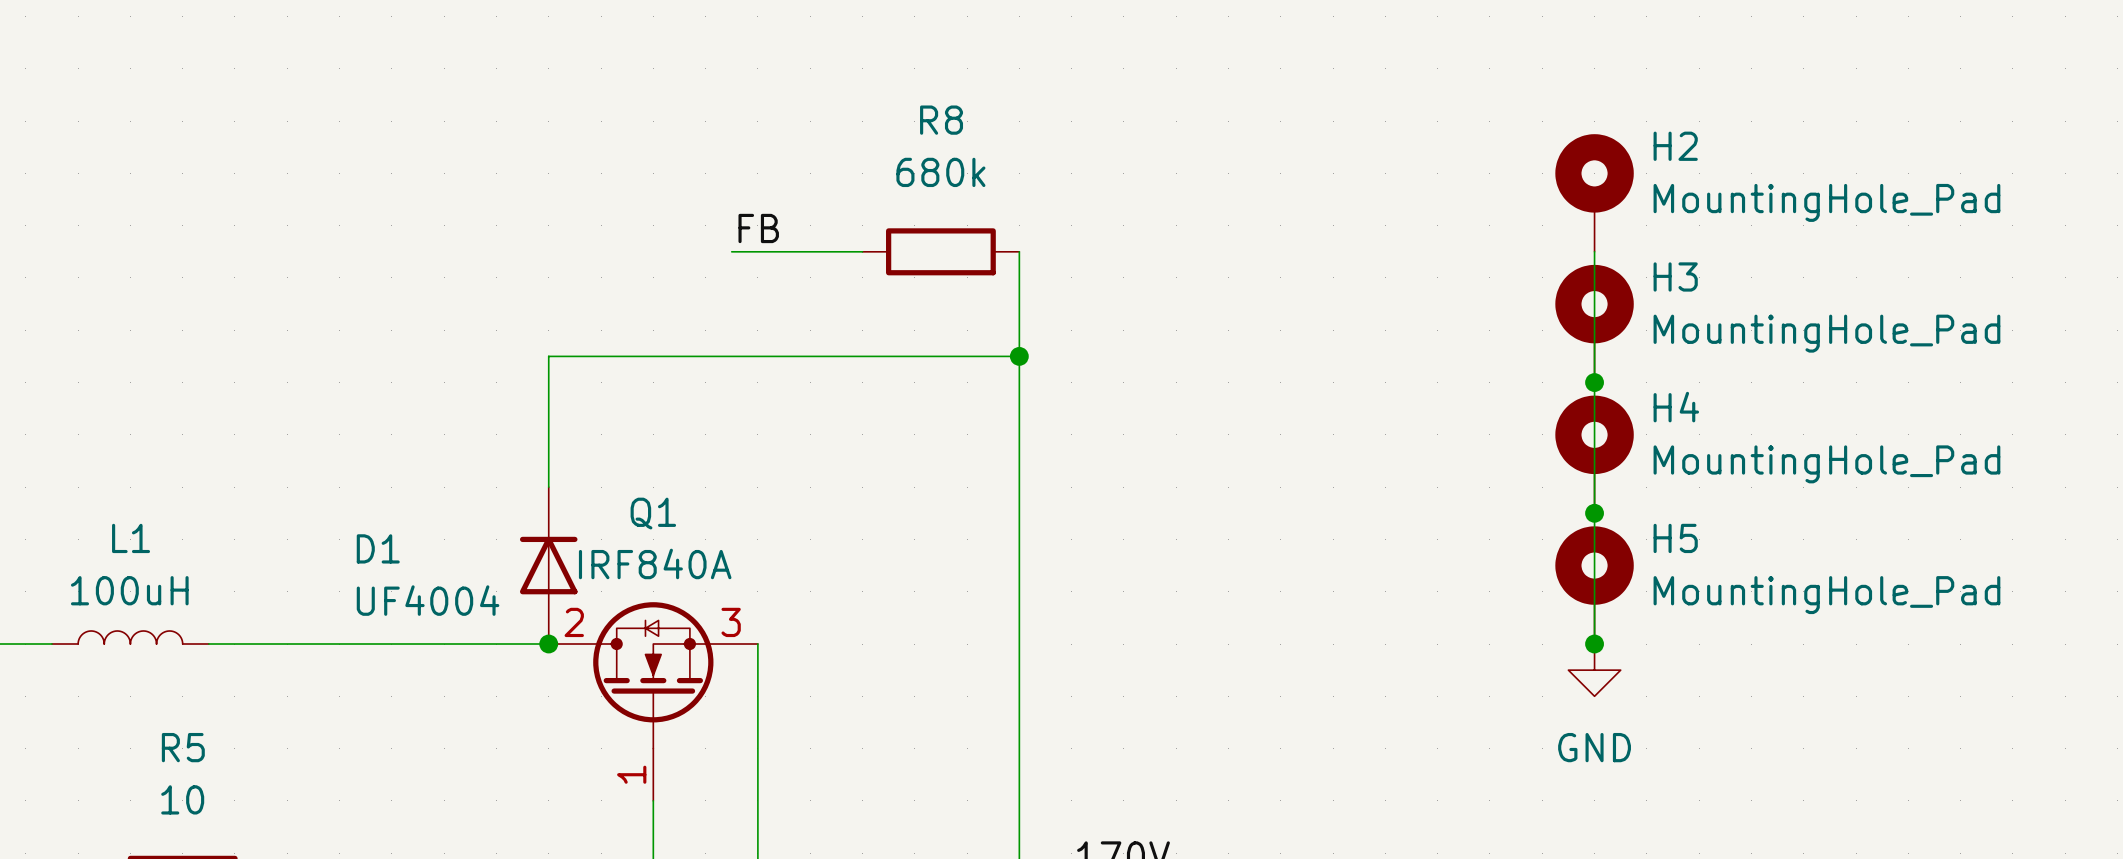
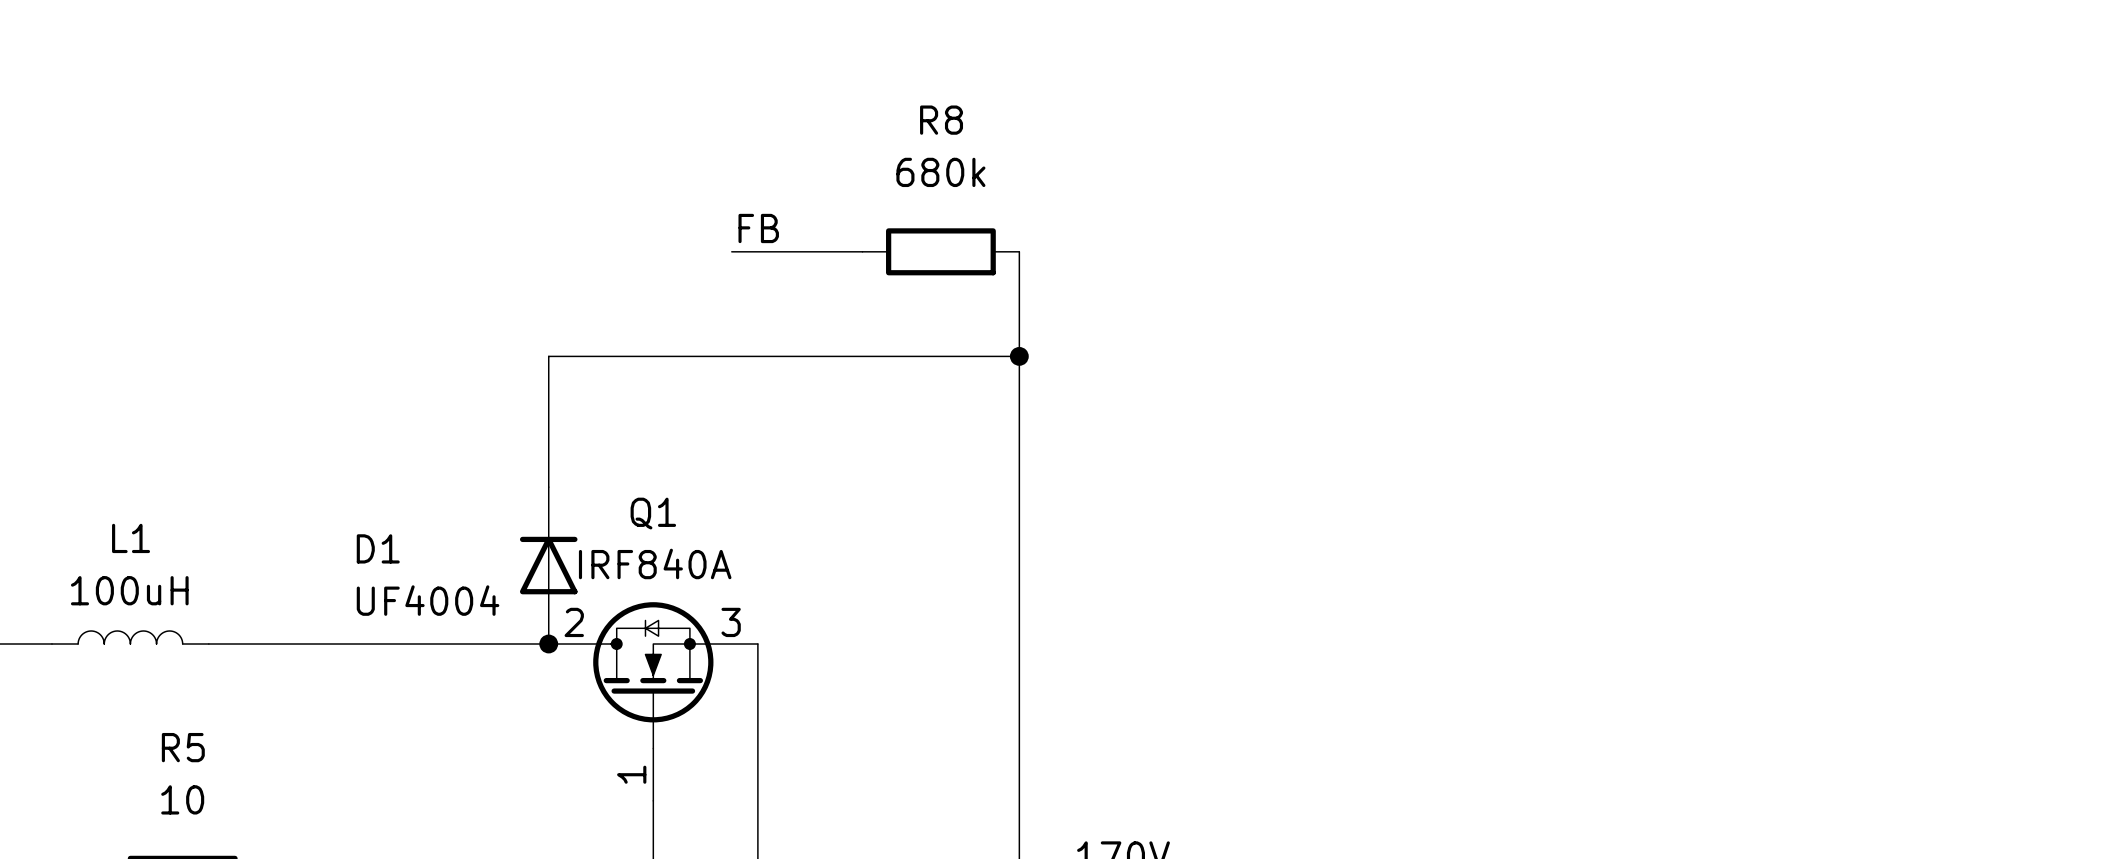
H2: MountingHole_Pad (1594, 192) -> none
wire: (1594, 251) (1594, 644) -> none
H3: MountingHole_Pad (1594, 323) -> none
junction: (1594, 382) -> none
H4: MountingHole_Pad (1594, 454) -> none
junction: (1594, 513) -> none
H5: MountingHole_Pad (1594, 585) -> none
junction: (1594, 644) -> none
power symbol: GND (1594, 670) -> none

